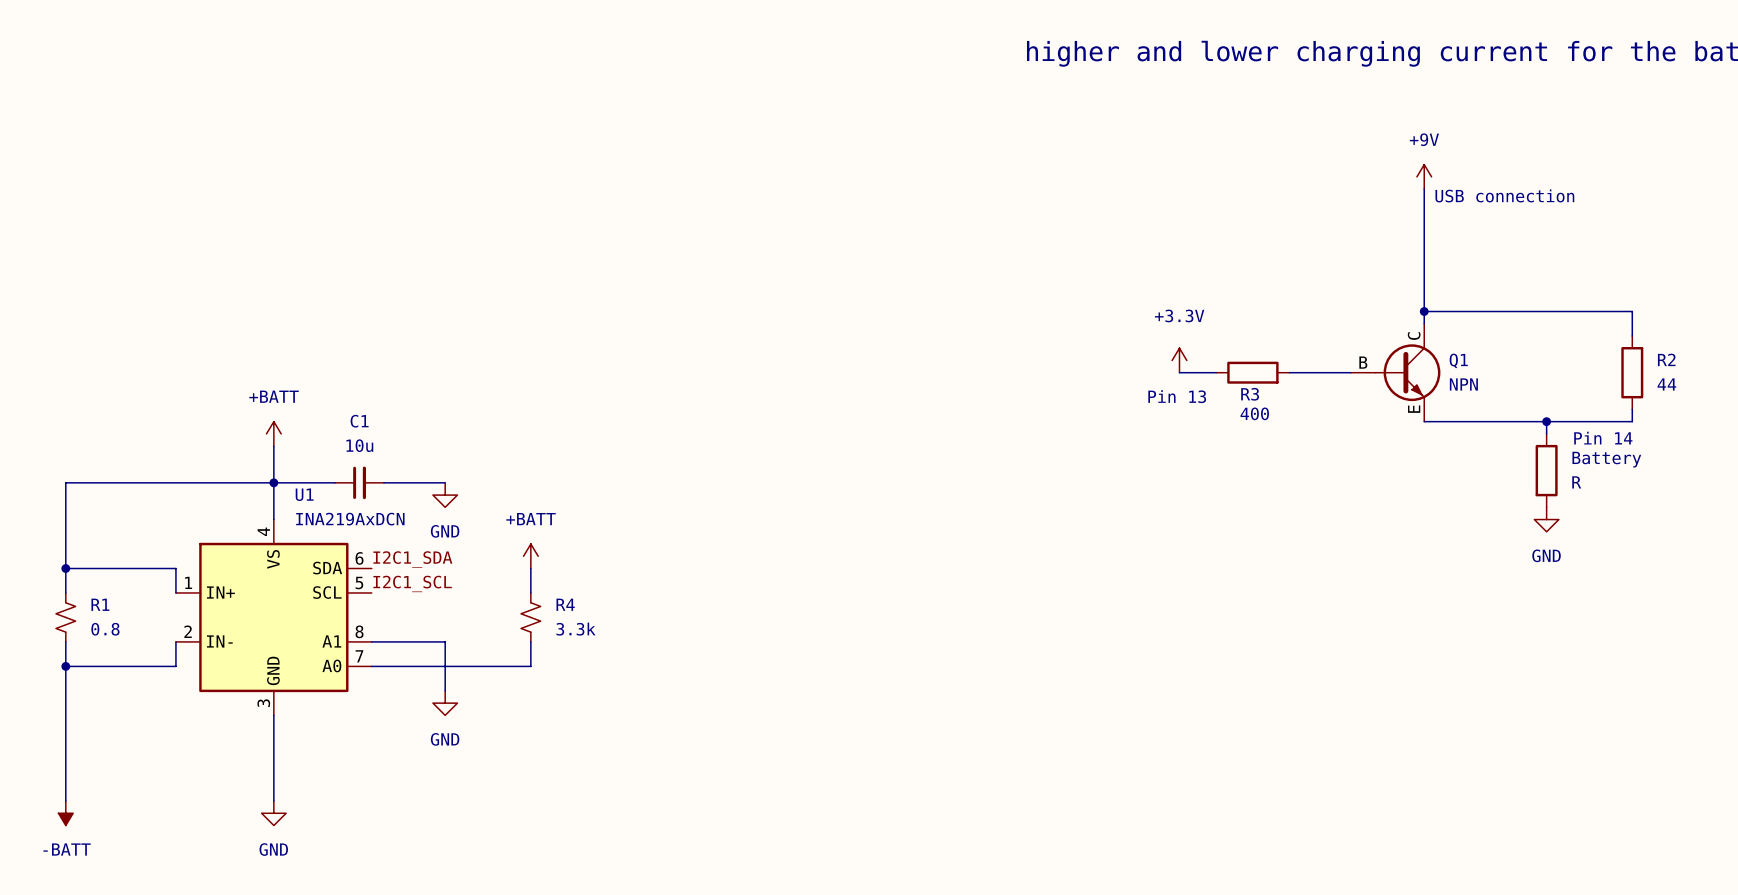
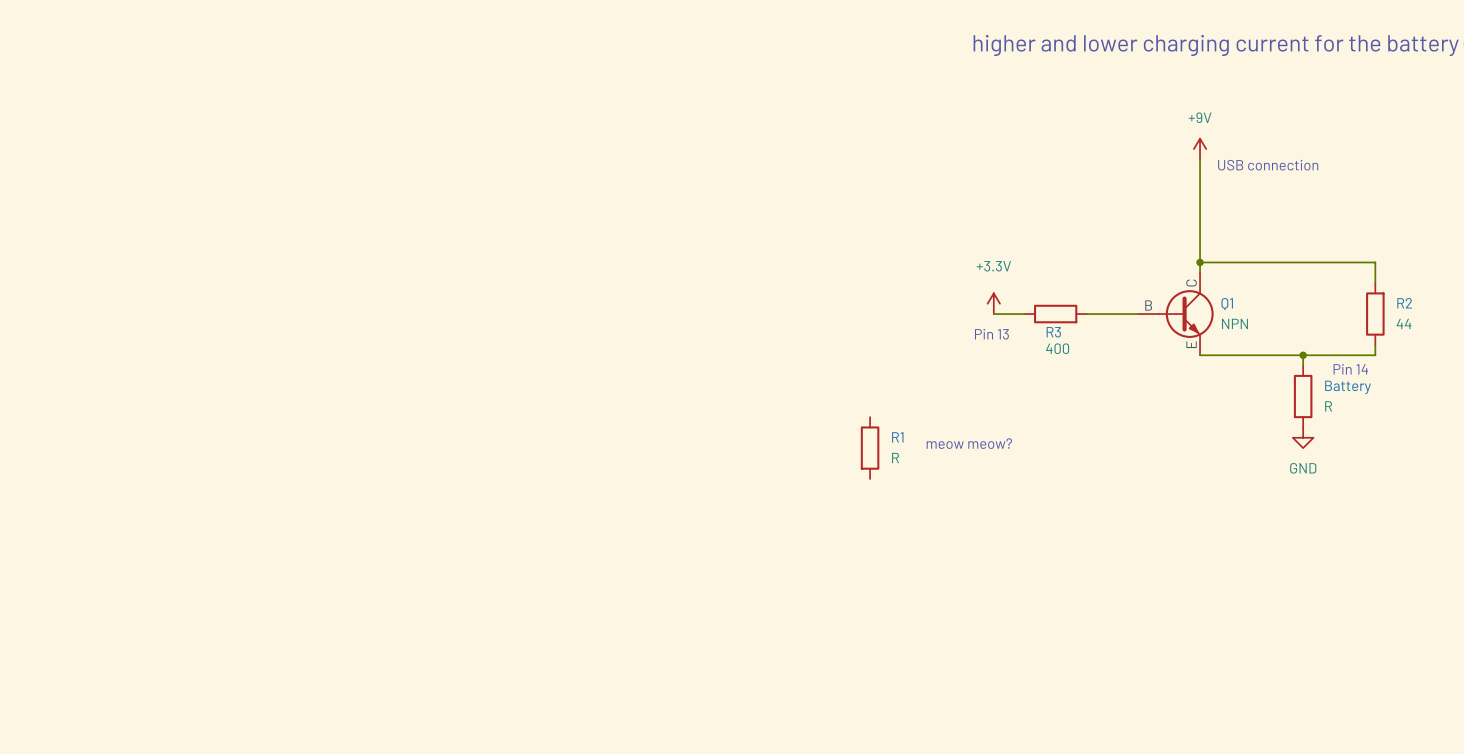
power symbol: +BATT (273, 433) -> none
wire: (273, 446) (273, 519) -> none
junction: (273, 482) -> none
wire: (335, 482) (65, 482) (65, 592) -> none
C1: 10u (359, 482) -> none
wire: (384, 482) (445, 482) -> none
power symbol: GND (445, 495) -> none
text: none -> meow meow? (969, 443)
power symbol: +BATT (530, 556) -> none
label: I2C1_SDA (412, 559) -> none
wire: (65, 568) (175, 568) (175, 592) -> none
junction: (65, 568) -> none
wire: (530, 568) (530, 592) -> none
label: I2C1_SCL (412, 583) -> none
R1 symbol: [56, 592, 76, 642] -> [860, 417, 880, 480]
U1: INA219AxDCN (273, 617) -> none
R4: 3.3k (530, 617) -> none
R1 value: 0.8 (105, 629) -> R (895, 458)
wire: (65, 641) (65, 801) -> none
wire: (175, 641) (175, 666) (65, 666) -> none
wire: (371, 641) (445, 641) (445, 690) -> none
wire: (530, 641) (530, 666) (371, 666) -> none
junction: (65, 666) -> none
power symbol: GND (445, 703) -> none
wire: (273, 715) (273, 801) -> none
power symbol: -BATT (65, 813) -> none
power symbol: GND (273, 813) -> none

